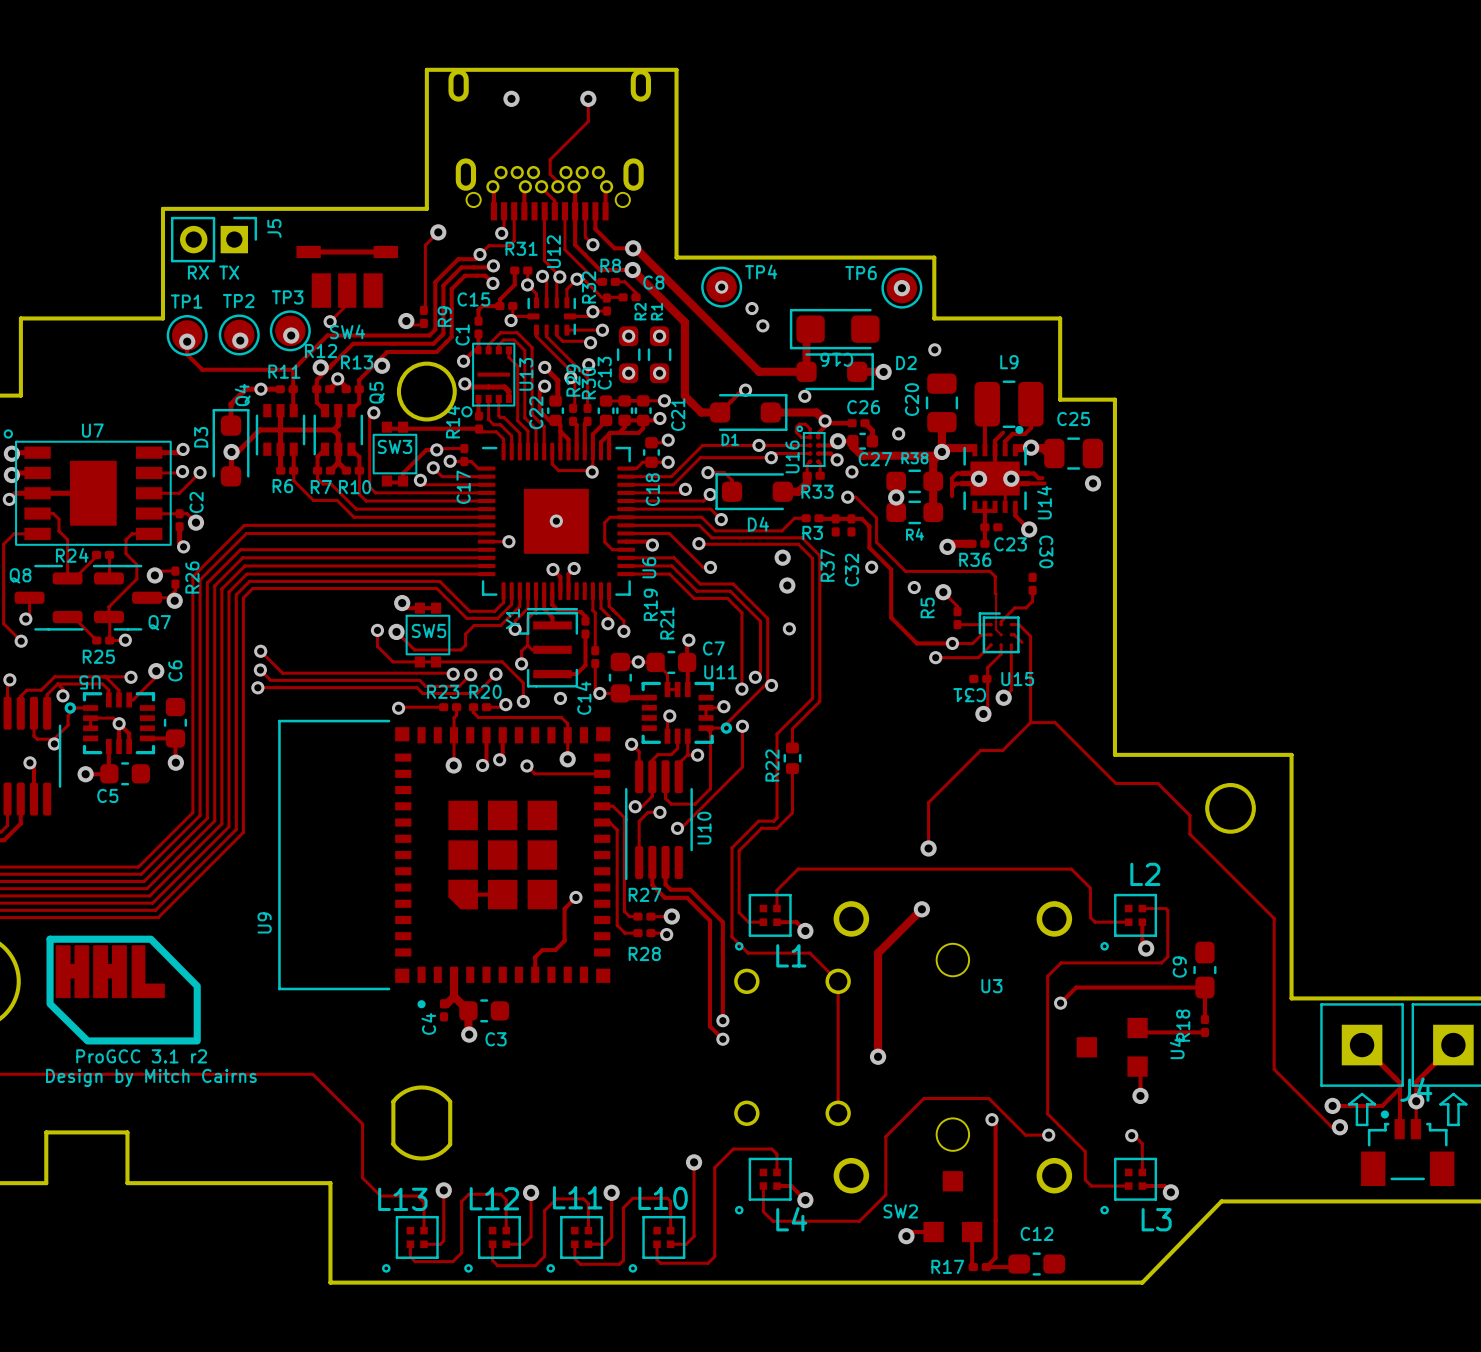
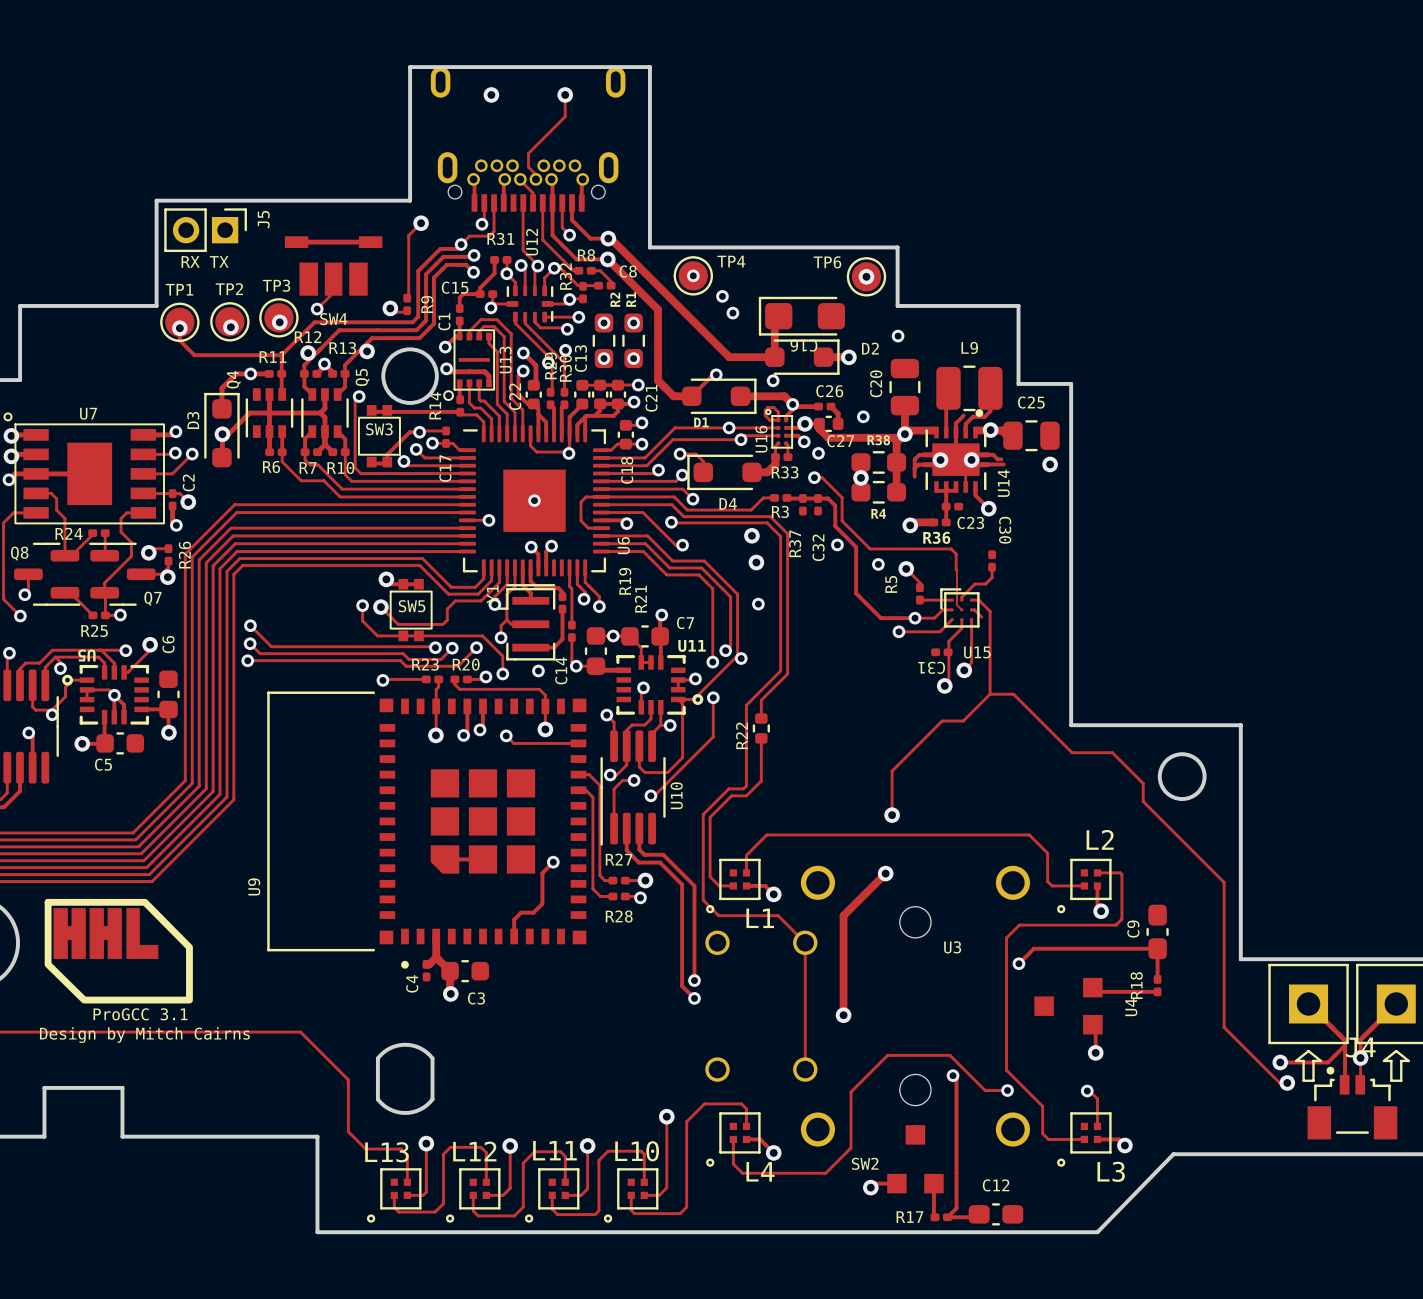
text: ProGCC 3.1 r2 (141, 1056) -> ProGCC 3.1 (140, 1014)

